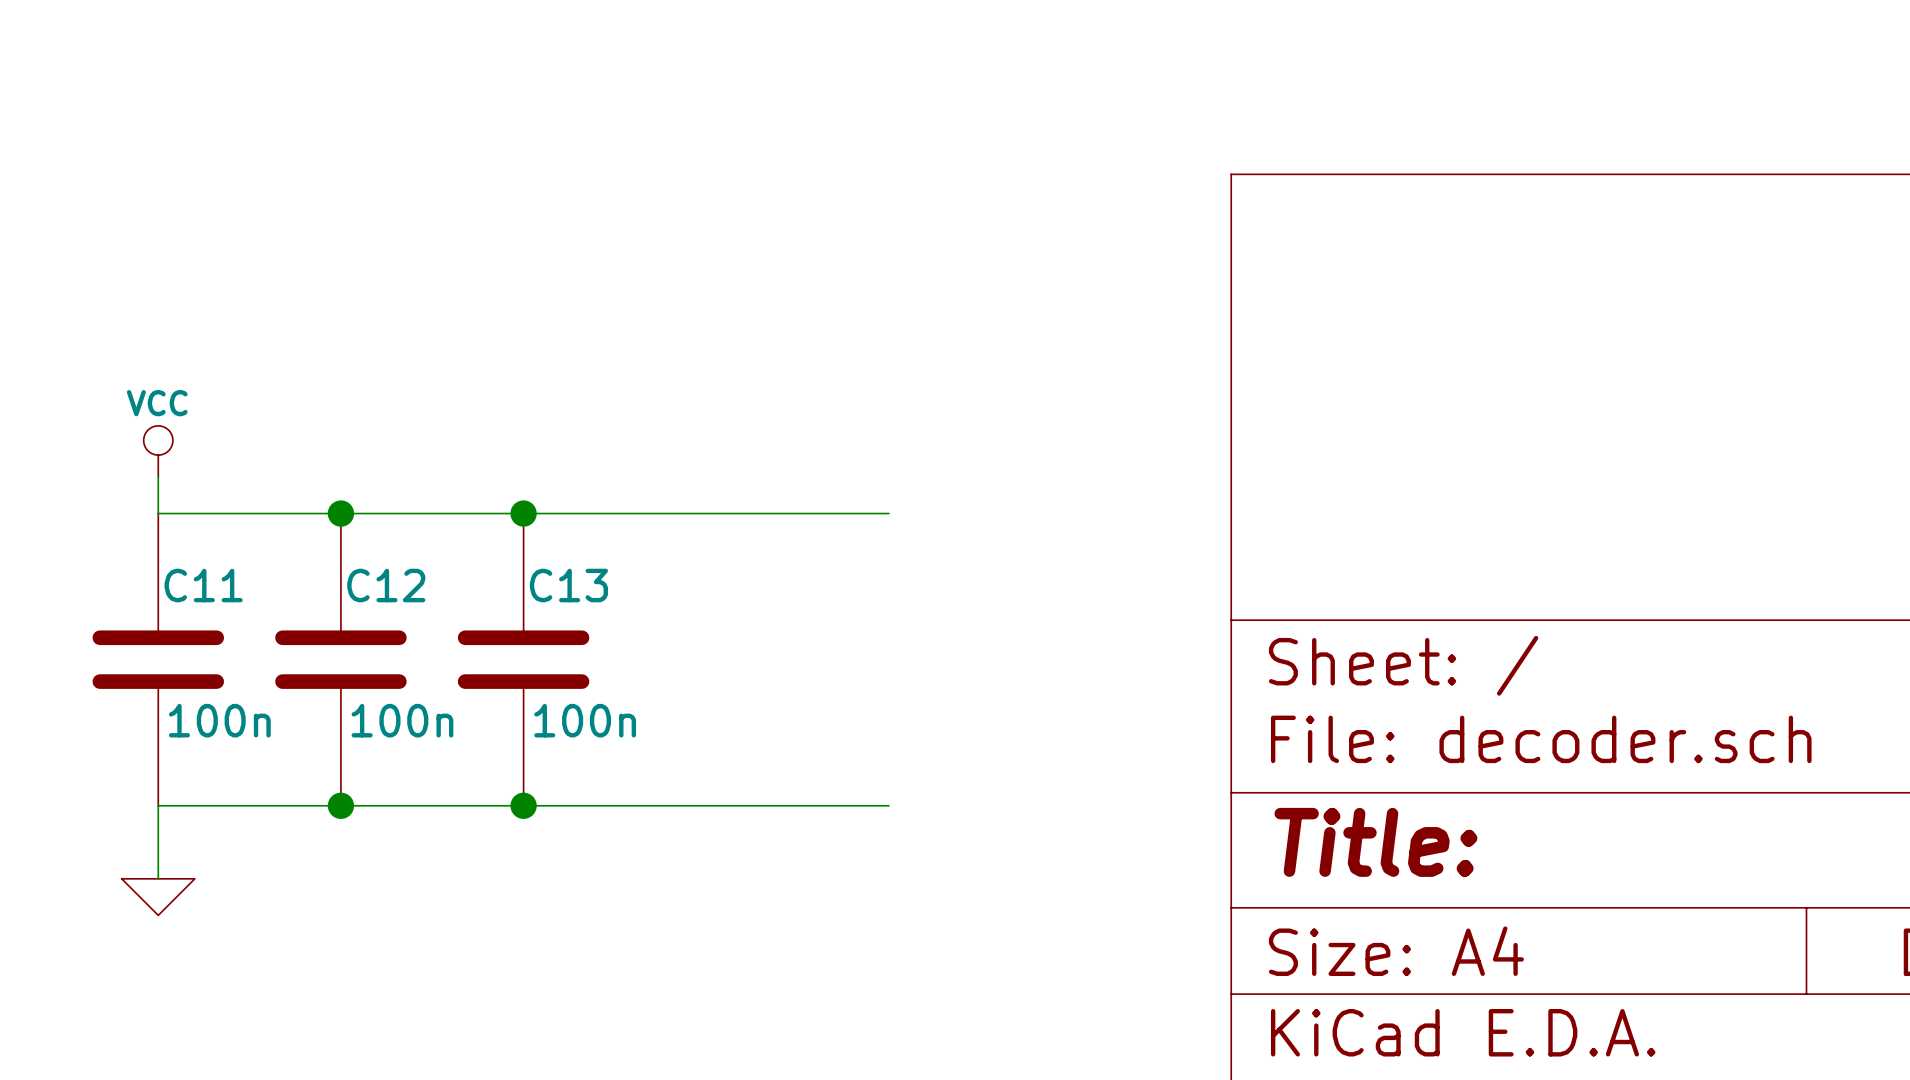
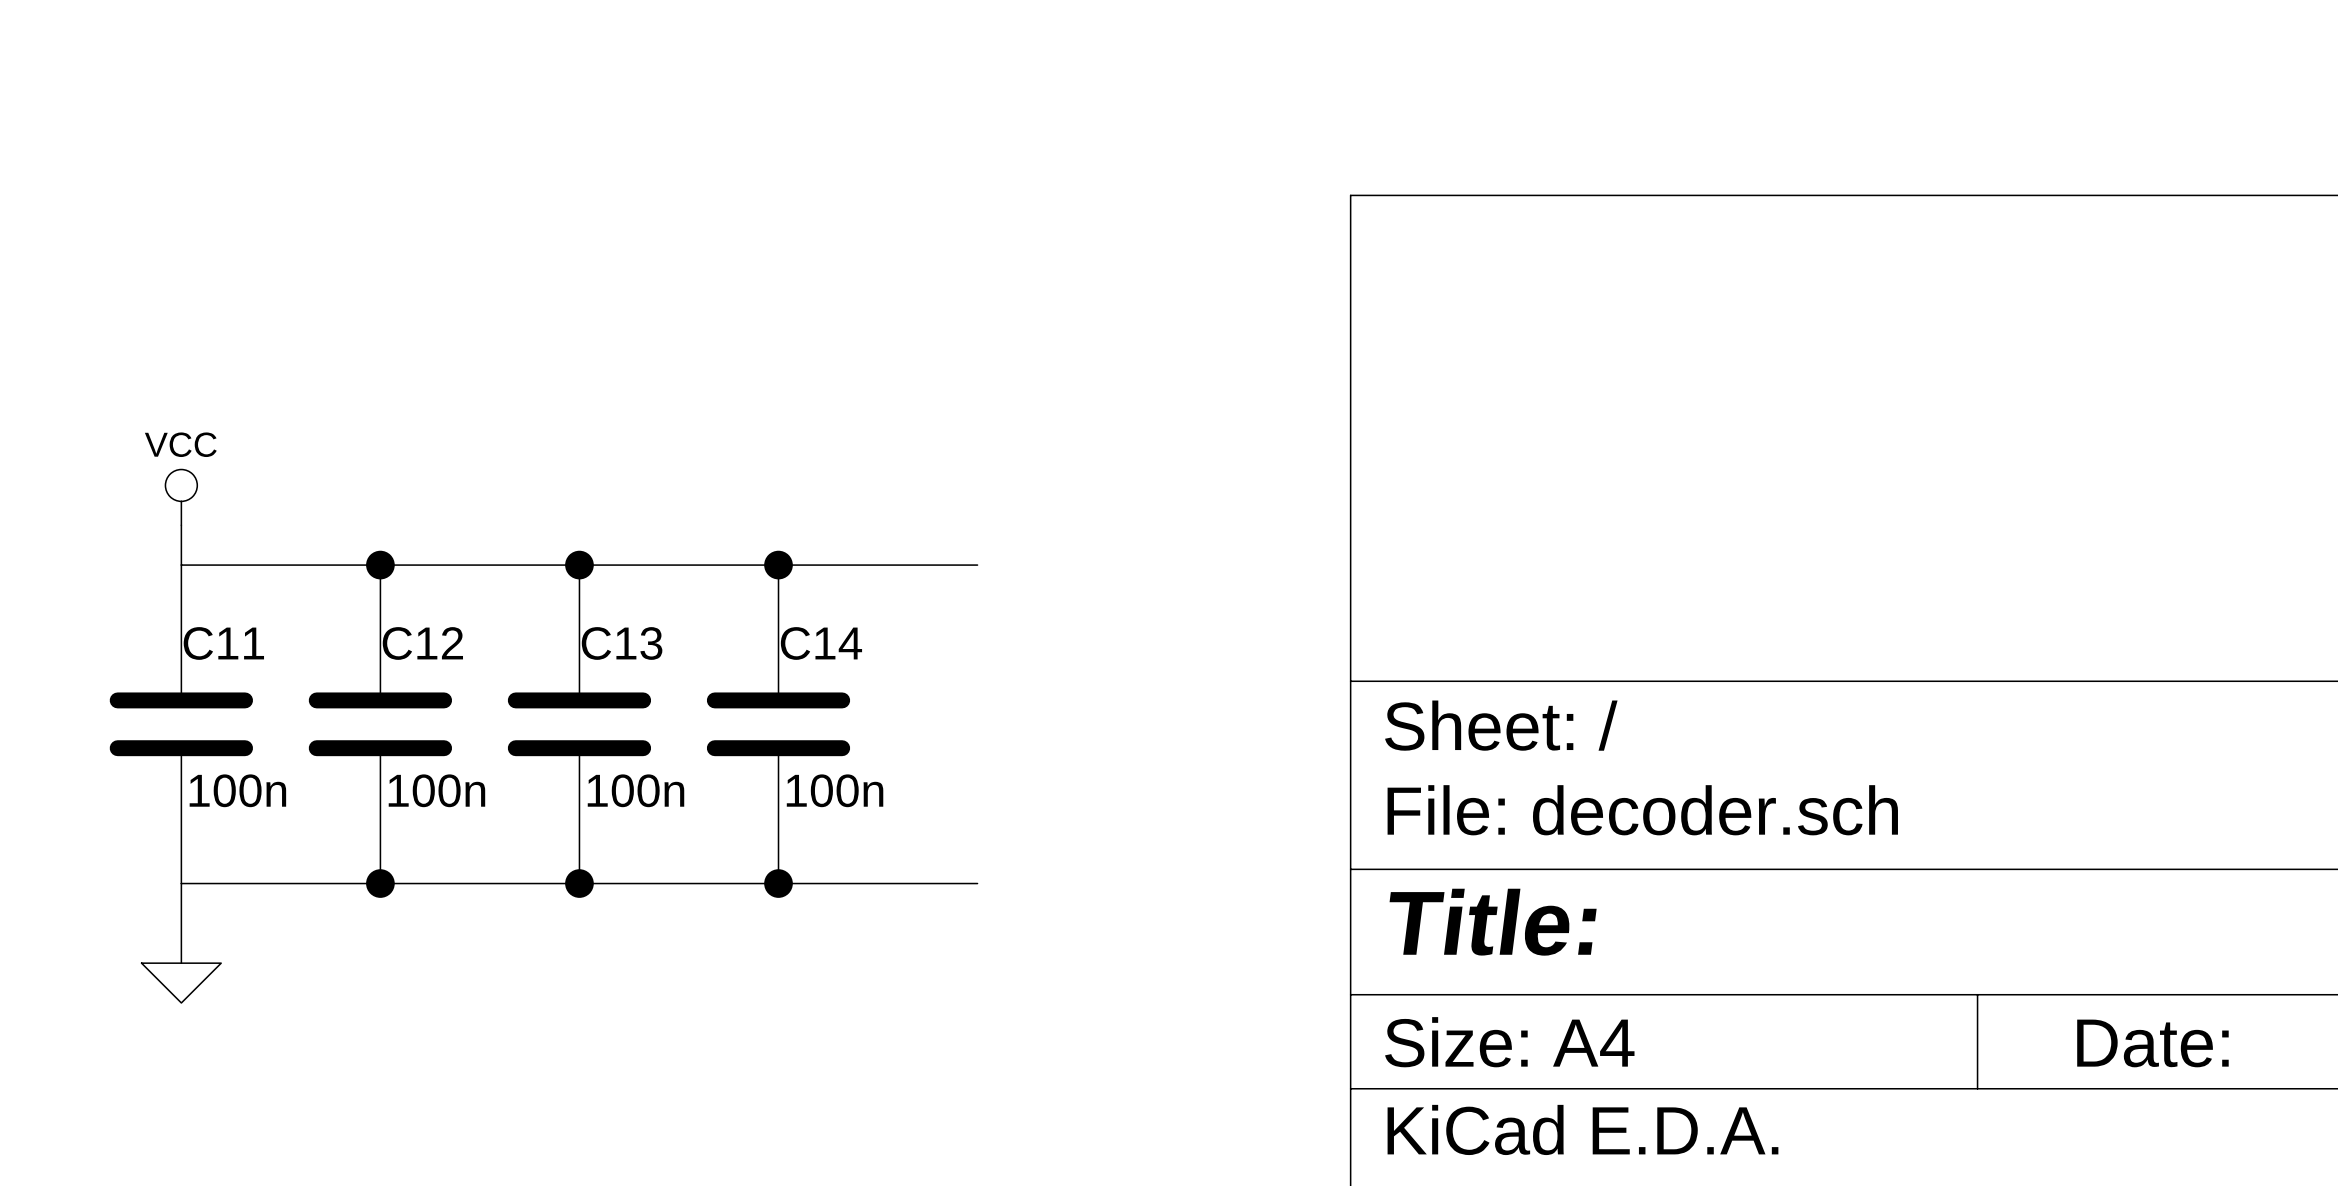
junction: none -> (778, 565)
C14: none -> 100n (778, 724)
junction: none -> (778, 883)

